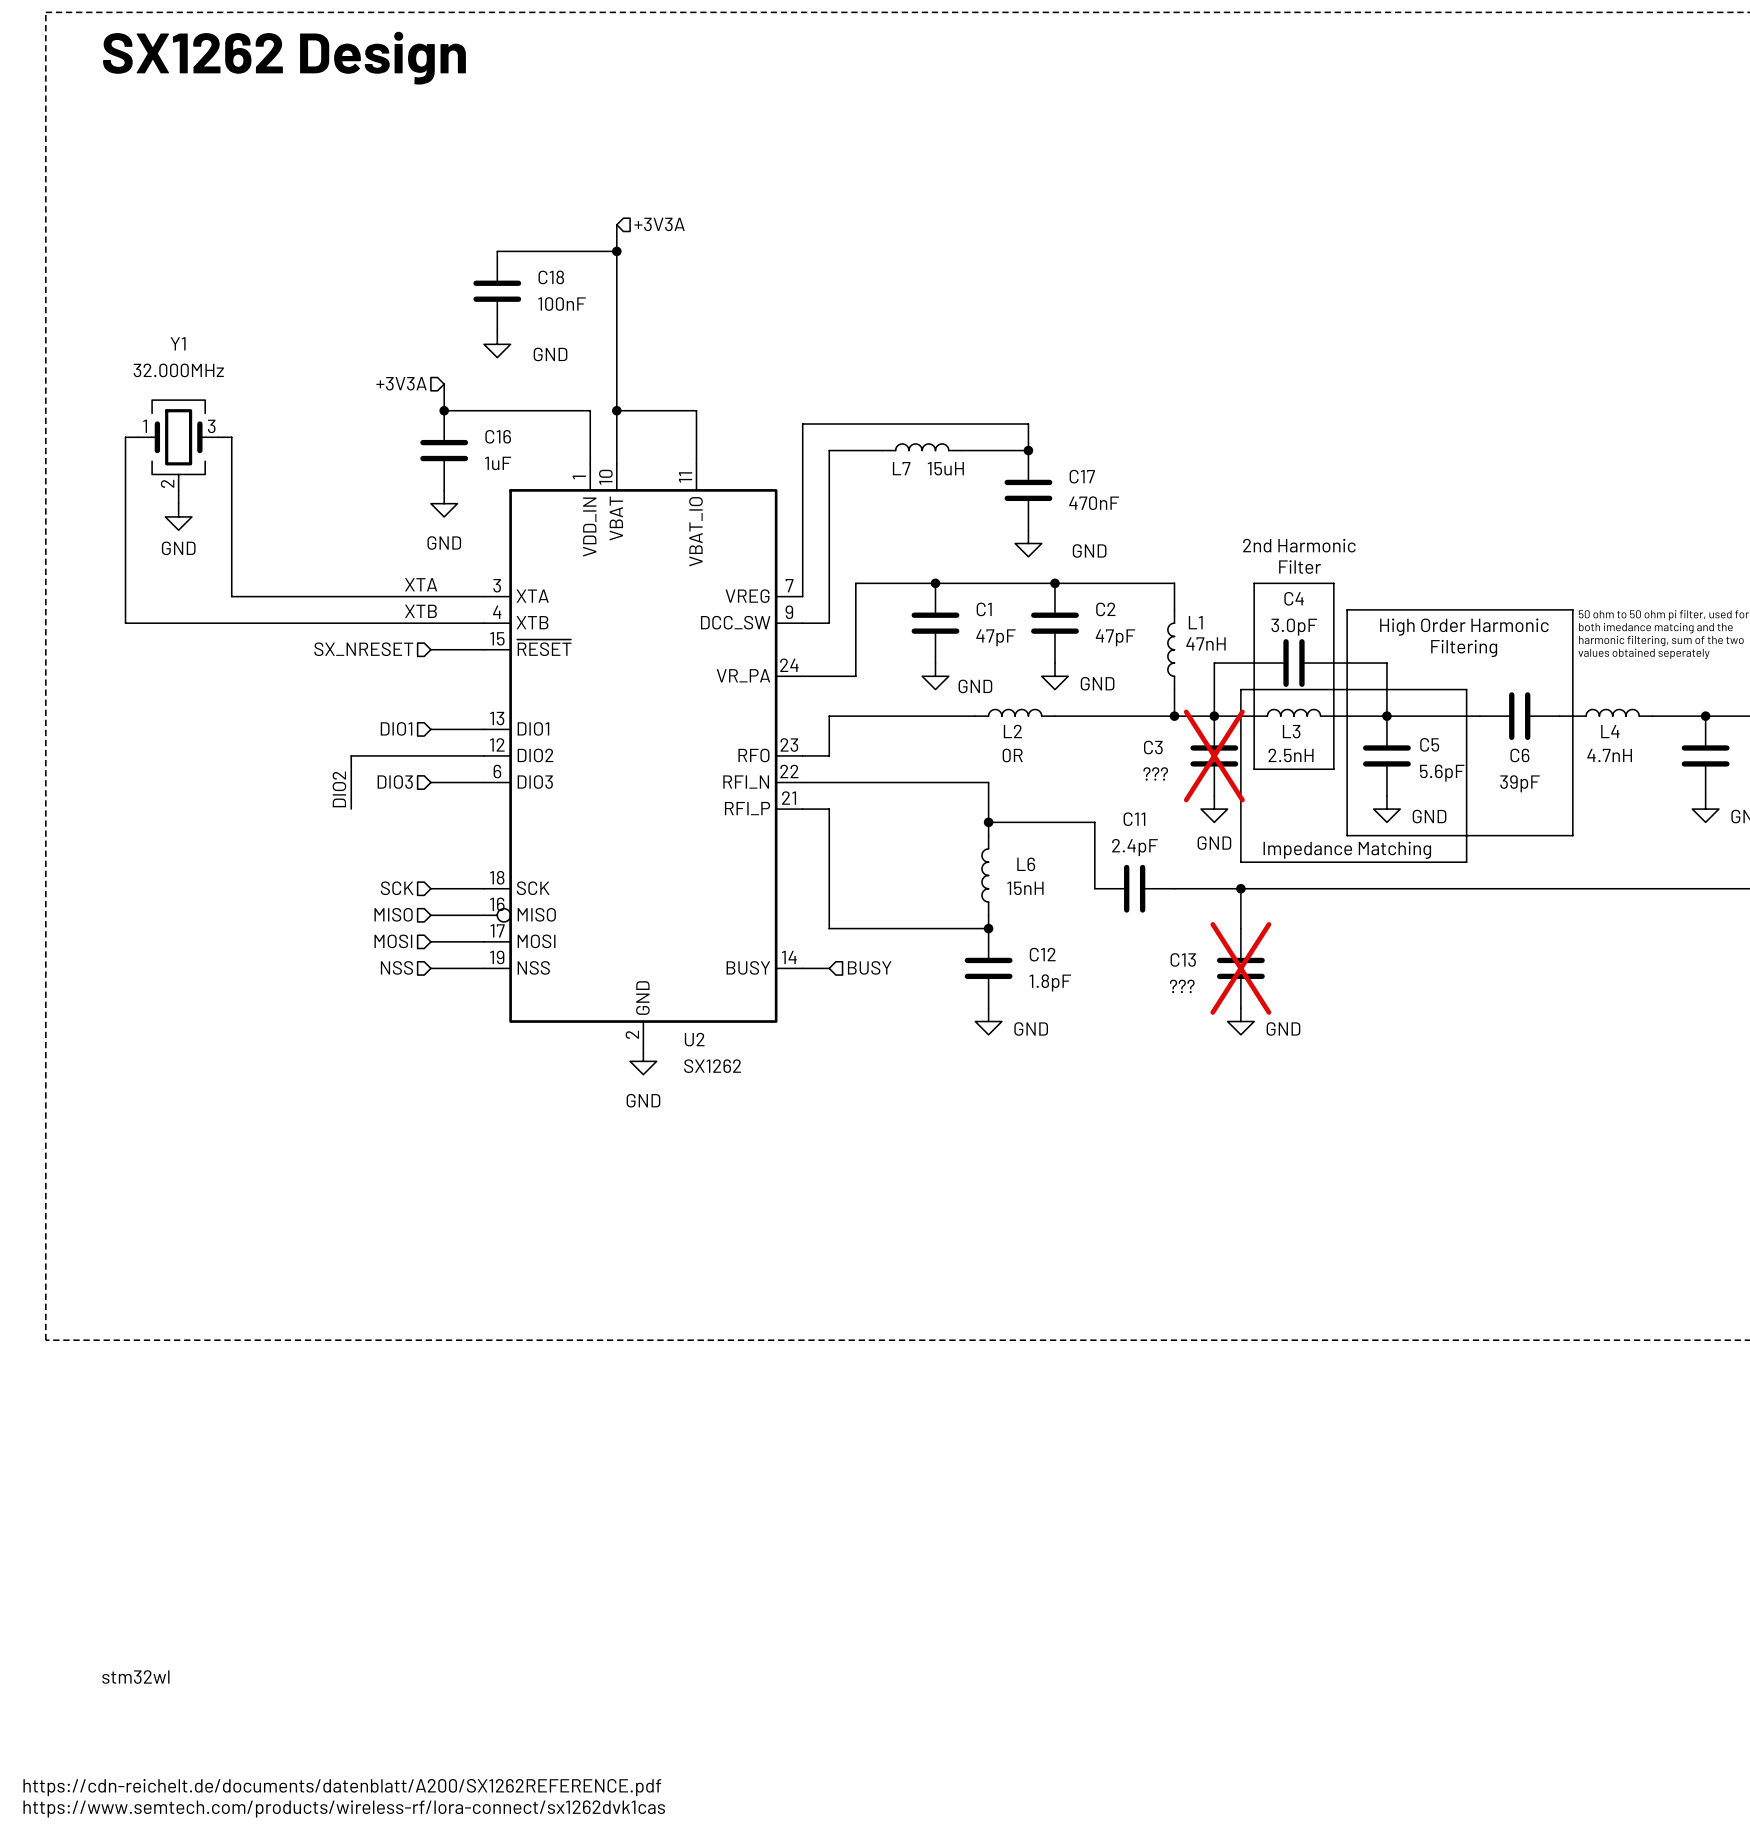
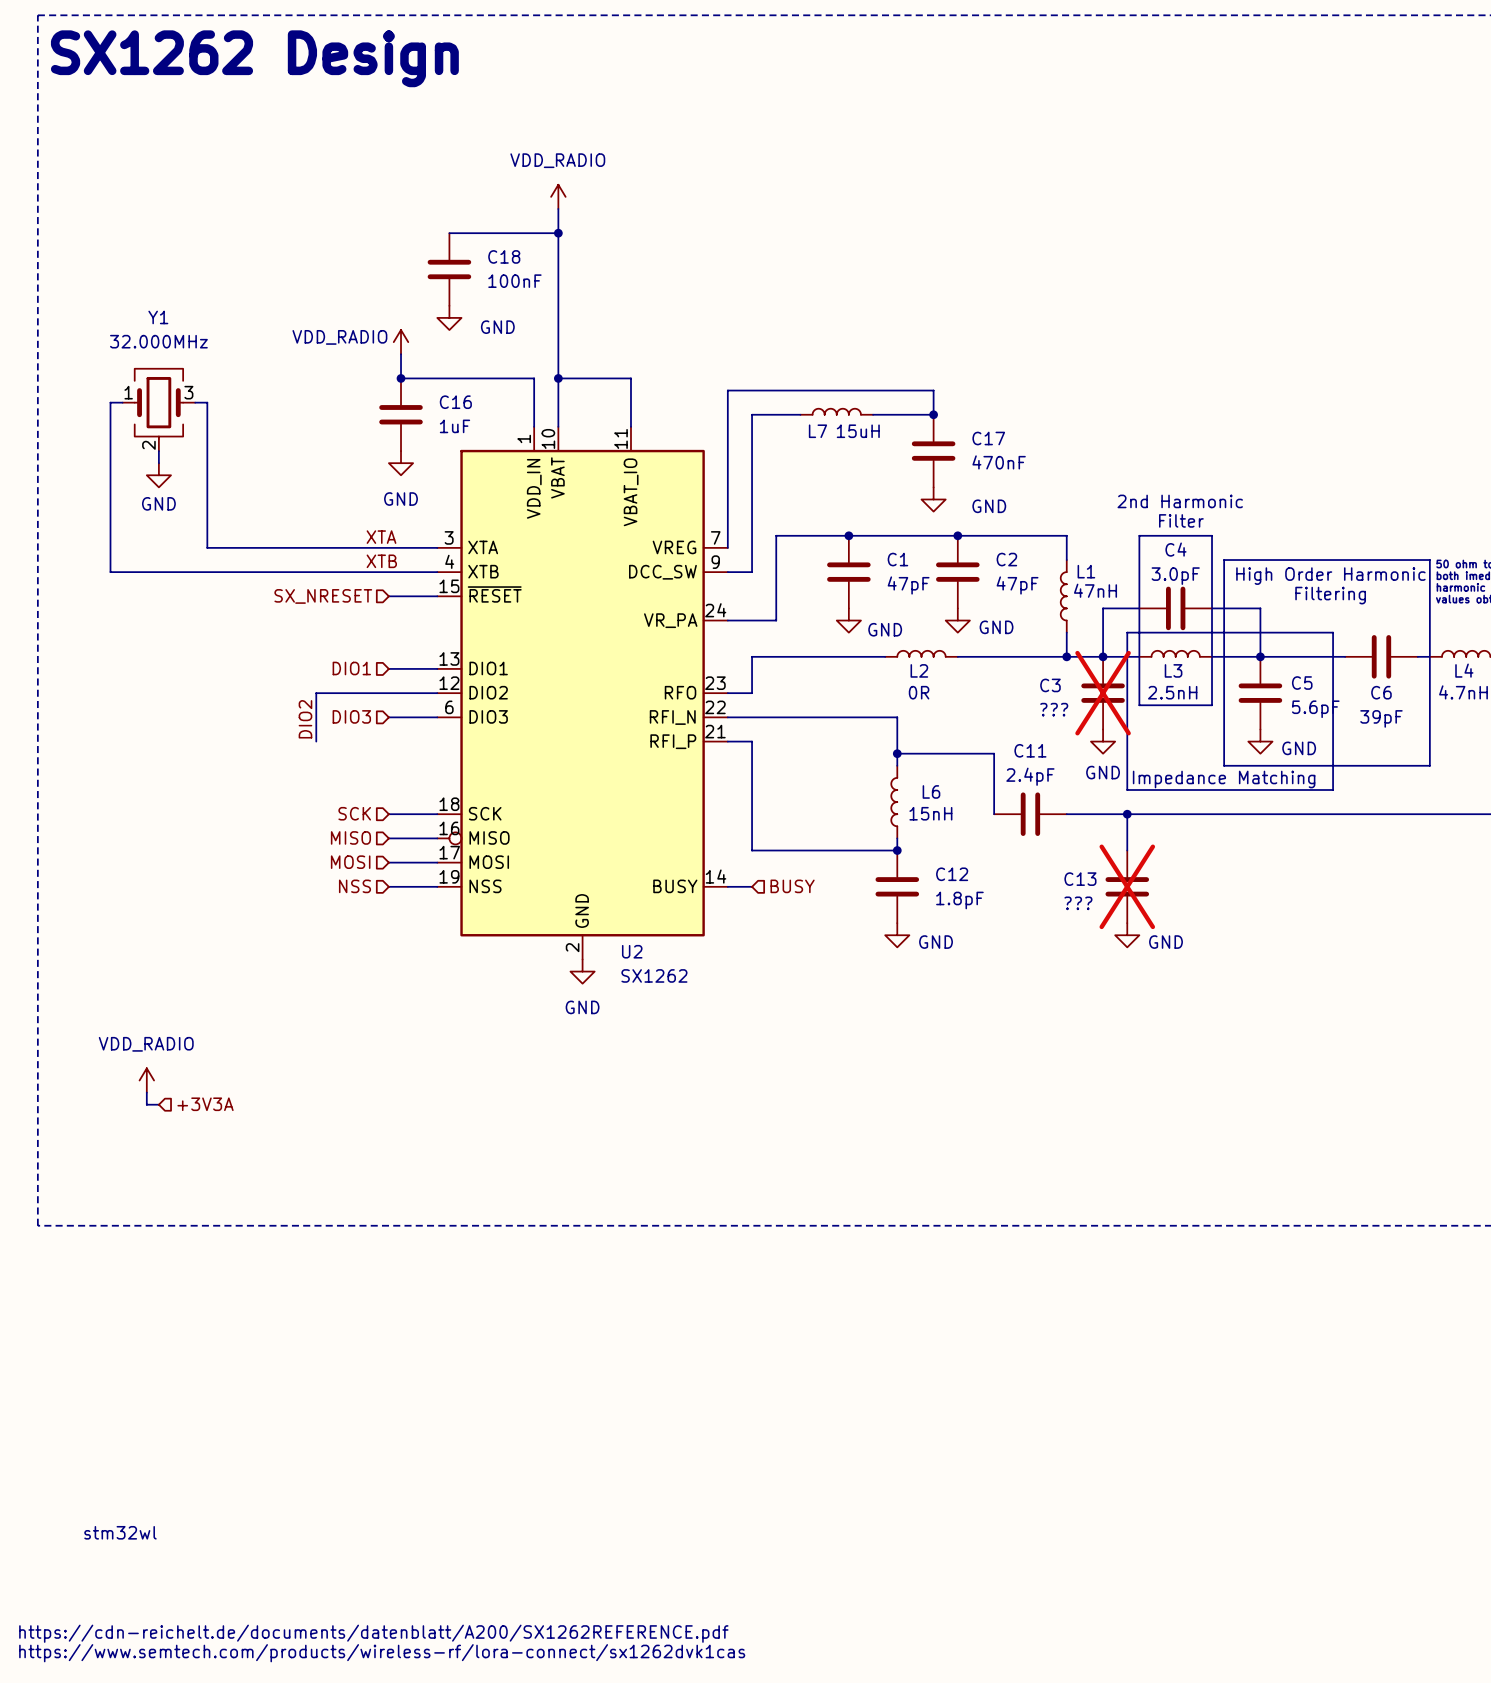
power symbol: none -> VDD_RADIO (558, 196)
hierarchical label: +3V3A (659, 224) -> none
power symbol: none -> VDD_RADIO (401, 342)
hierarchical label: +3V3A (401, 383) -> none
power symbol: none -> VDD_RADIO (146, 1080)
wire: none -> (146, 1092) (146, 1104) (158, 1104)
hierarchical label: none -> +3V3A (205, 1104)

